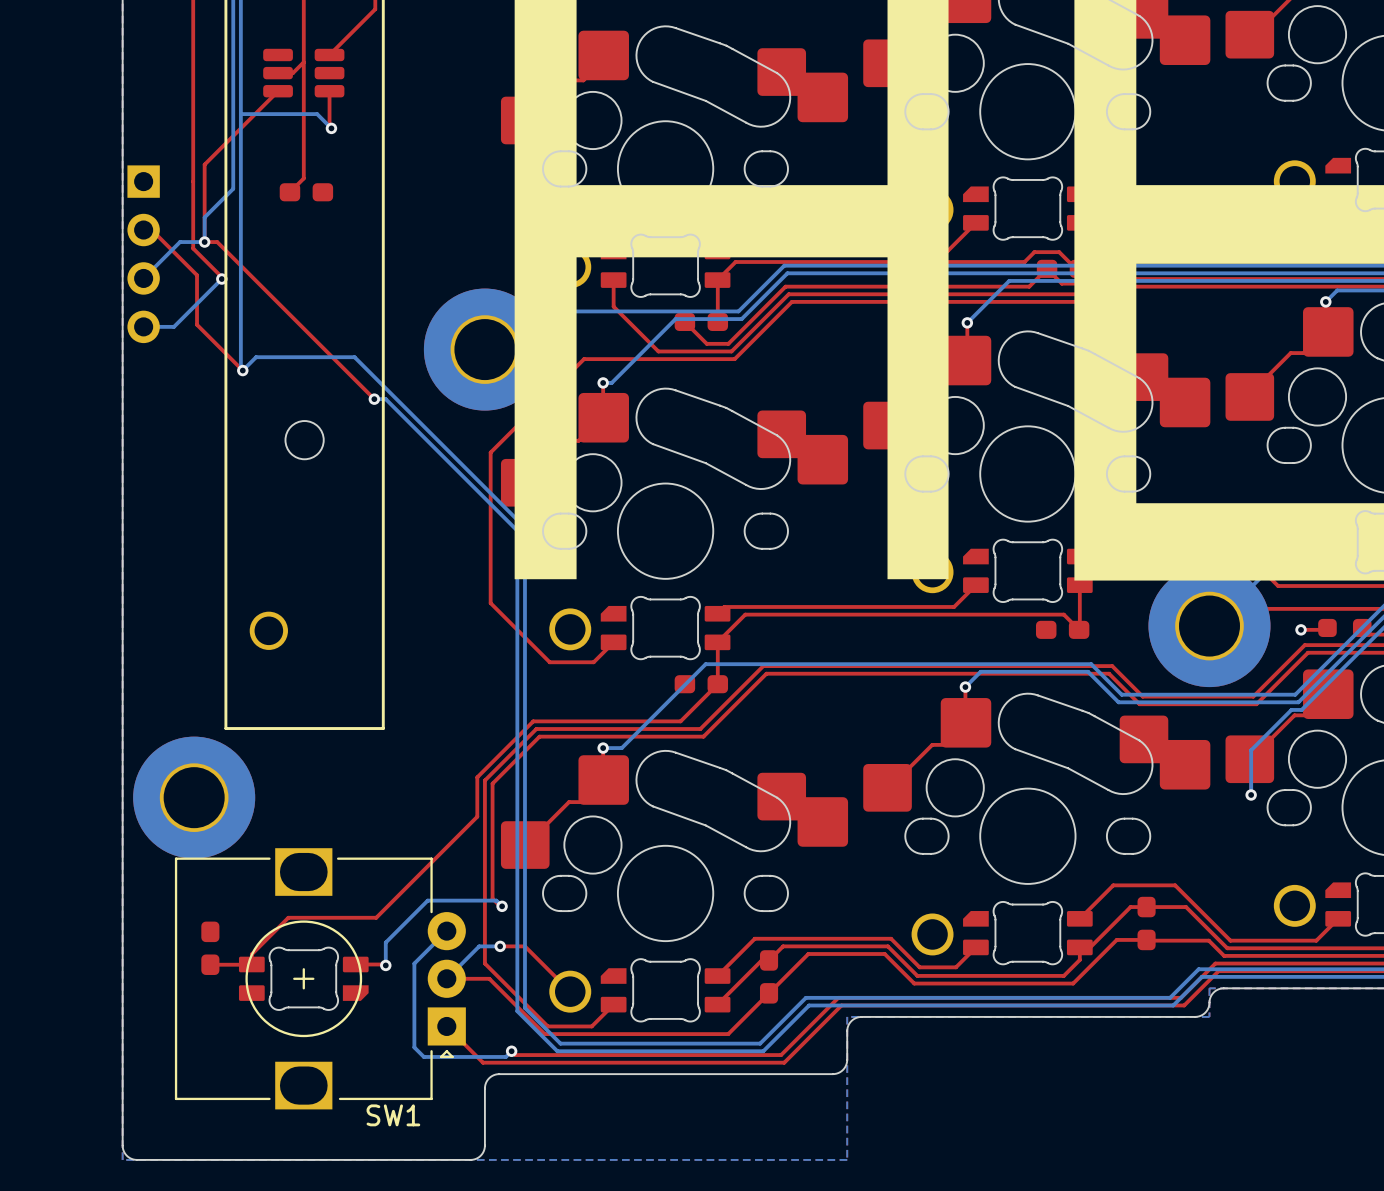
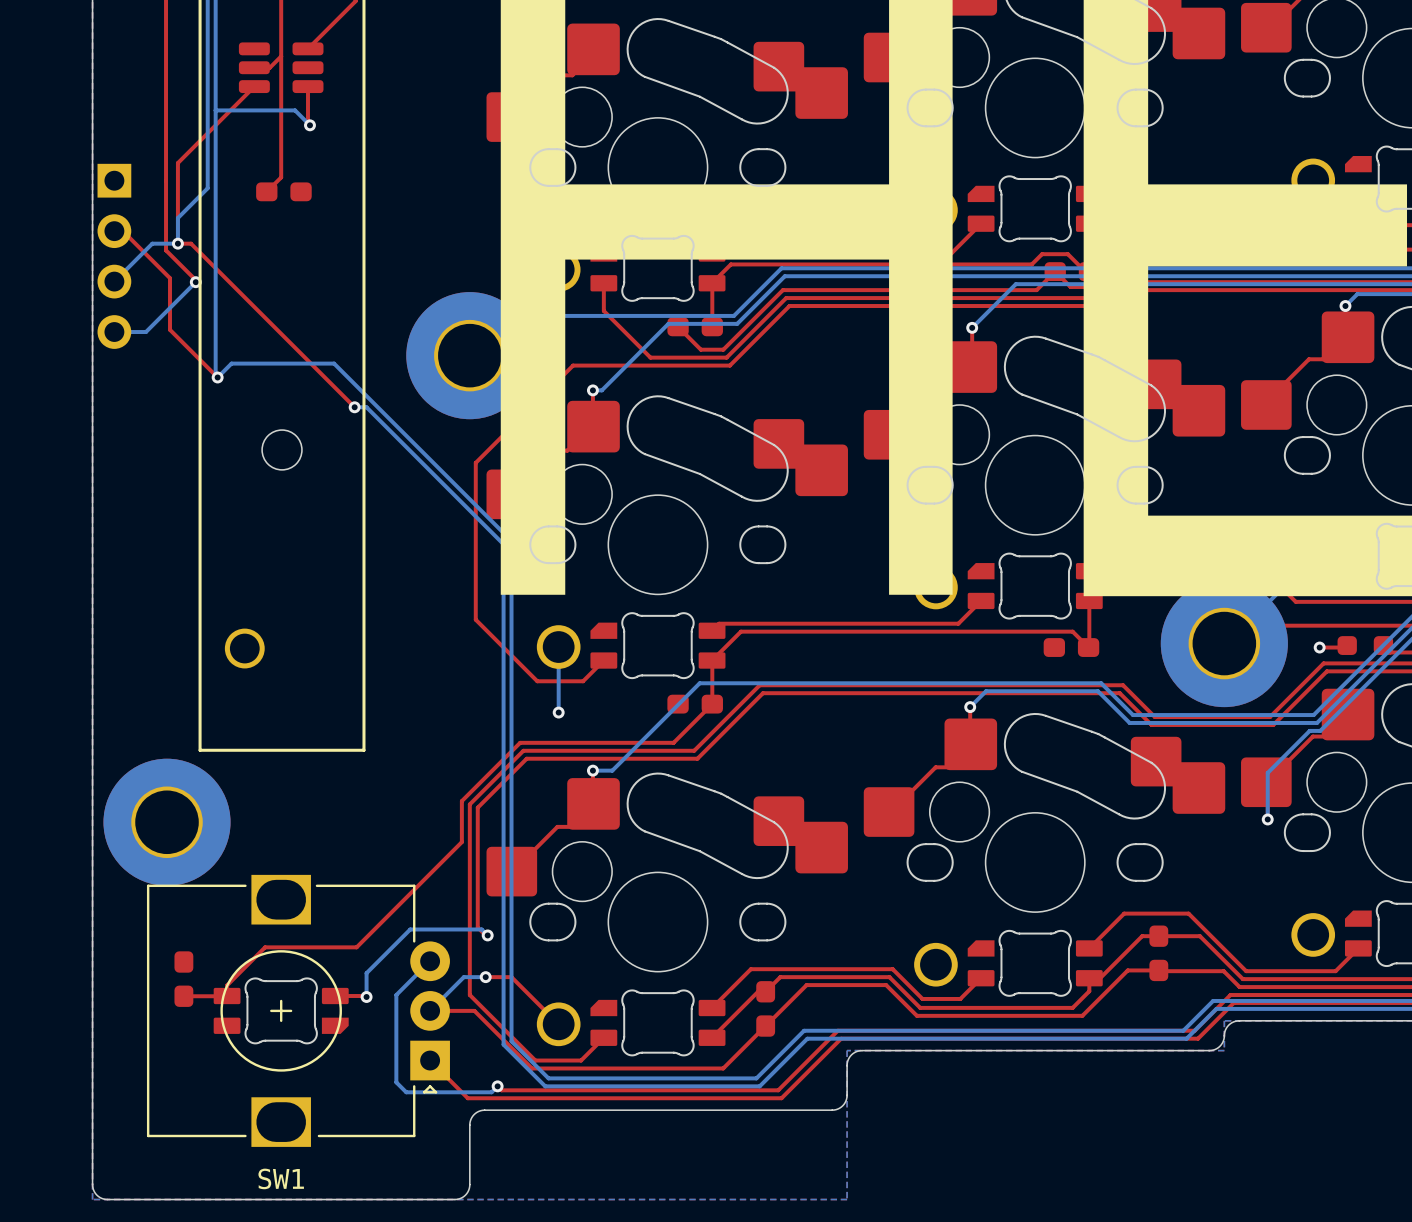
bottom track: none -> (558, 647) (558, 712)
via: none -> (558, 712)
SW1 name position: SW1 (393, 1115) -> SW1 (281, 1178)

